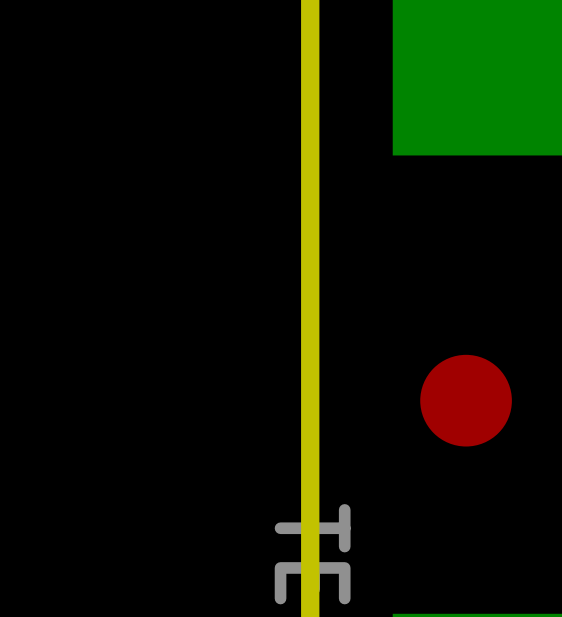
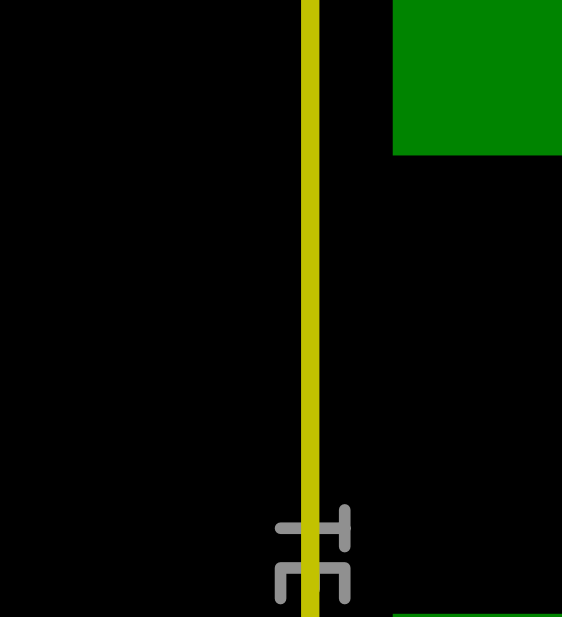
part: (466, 400) -> none

